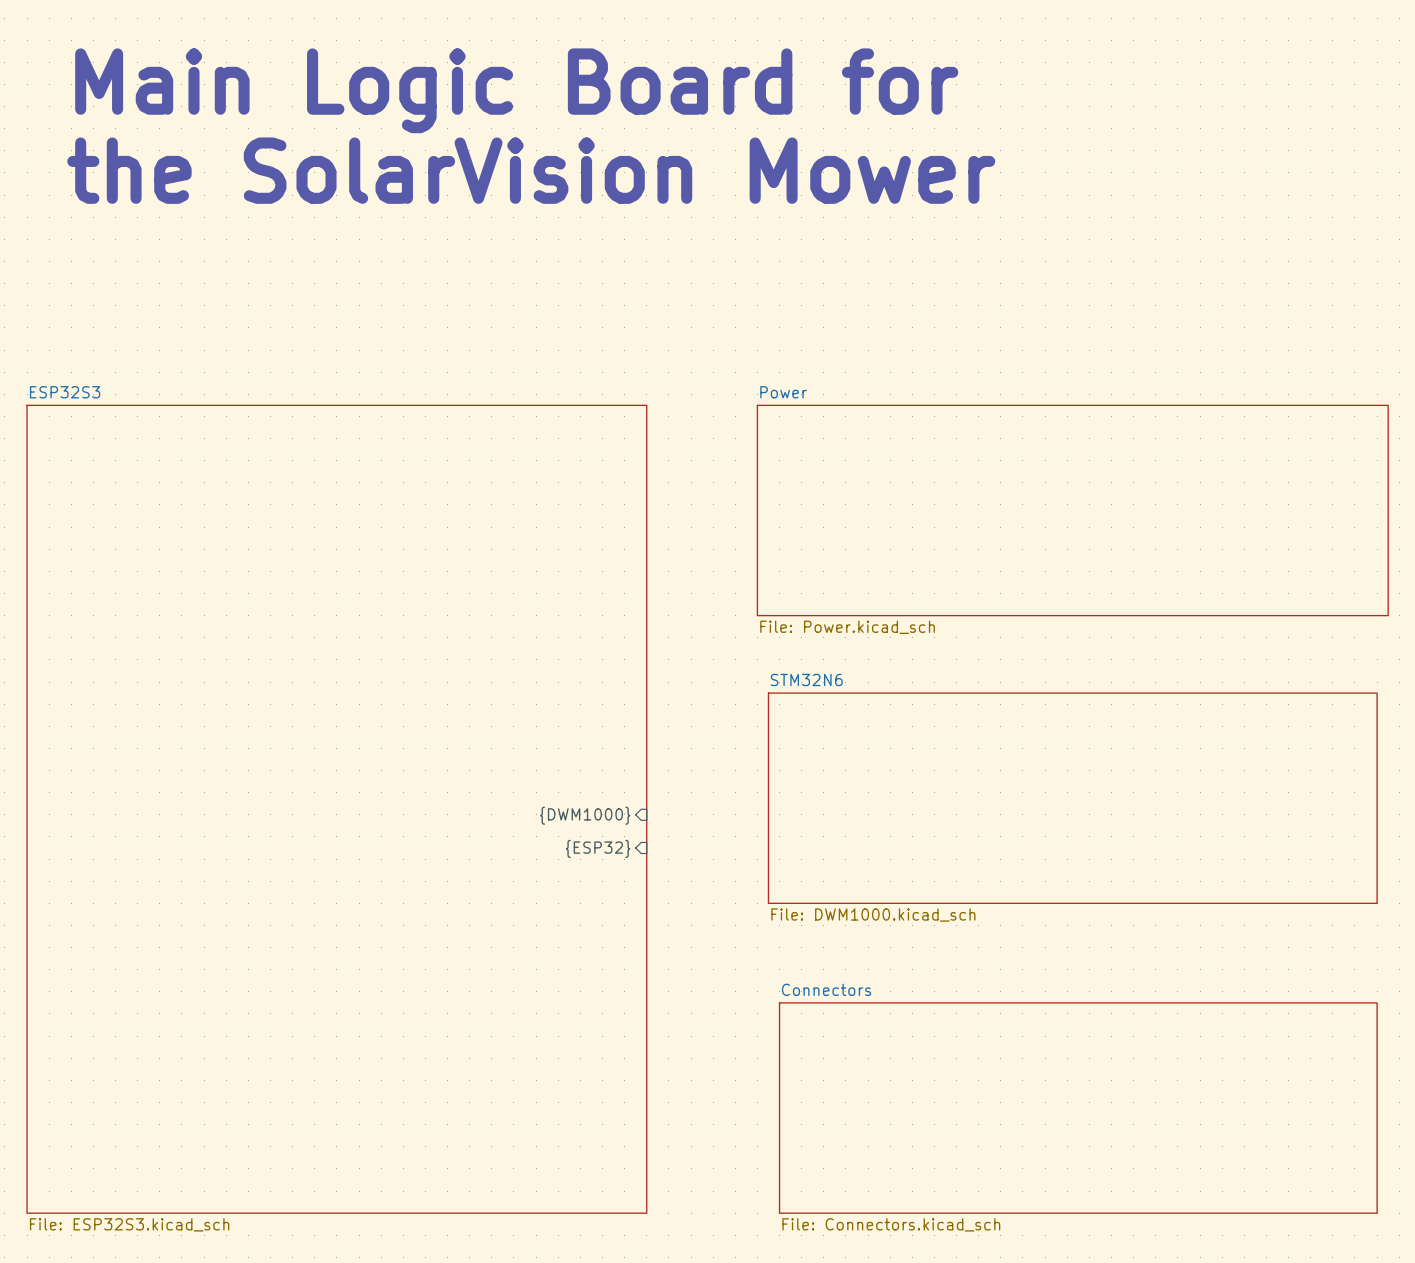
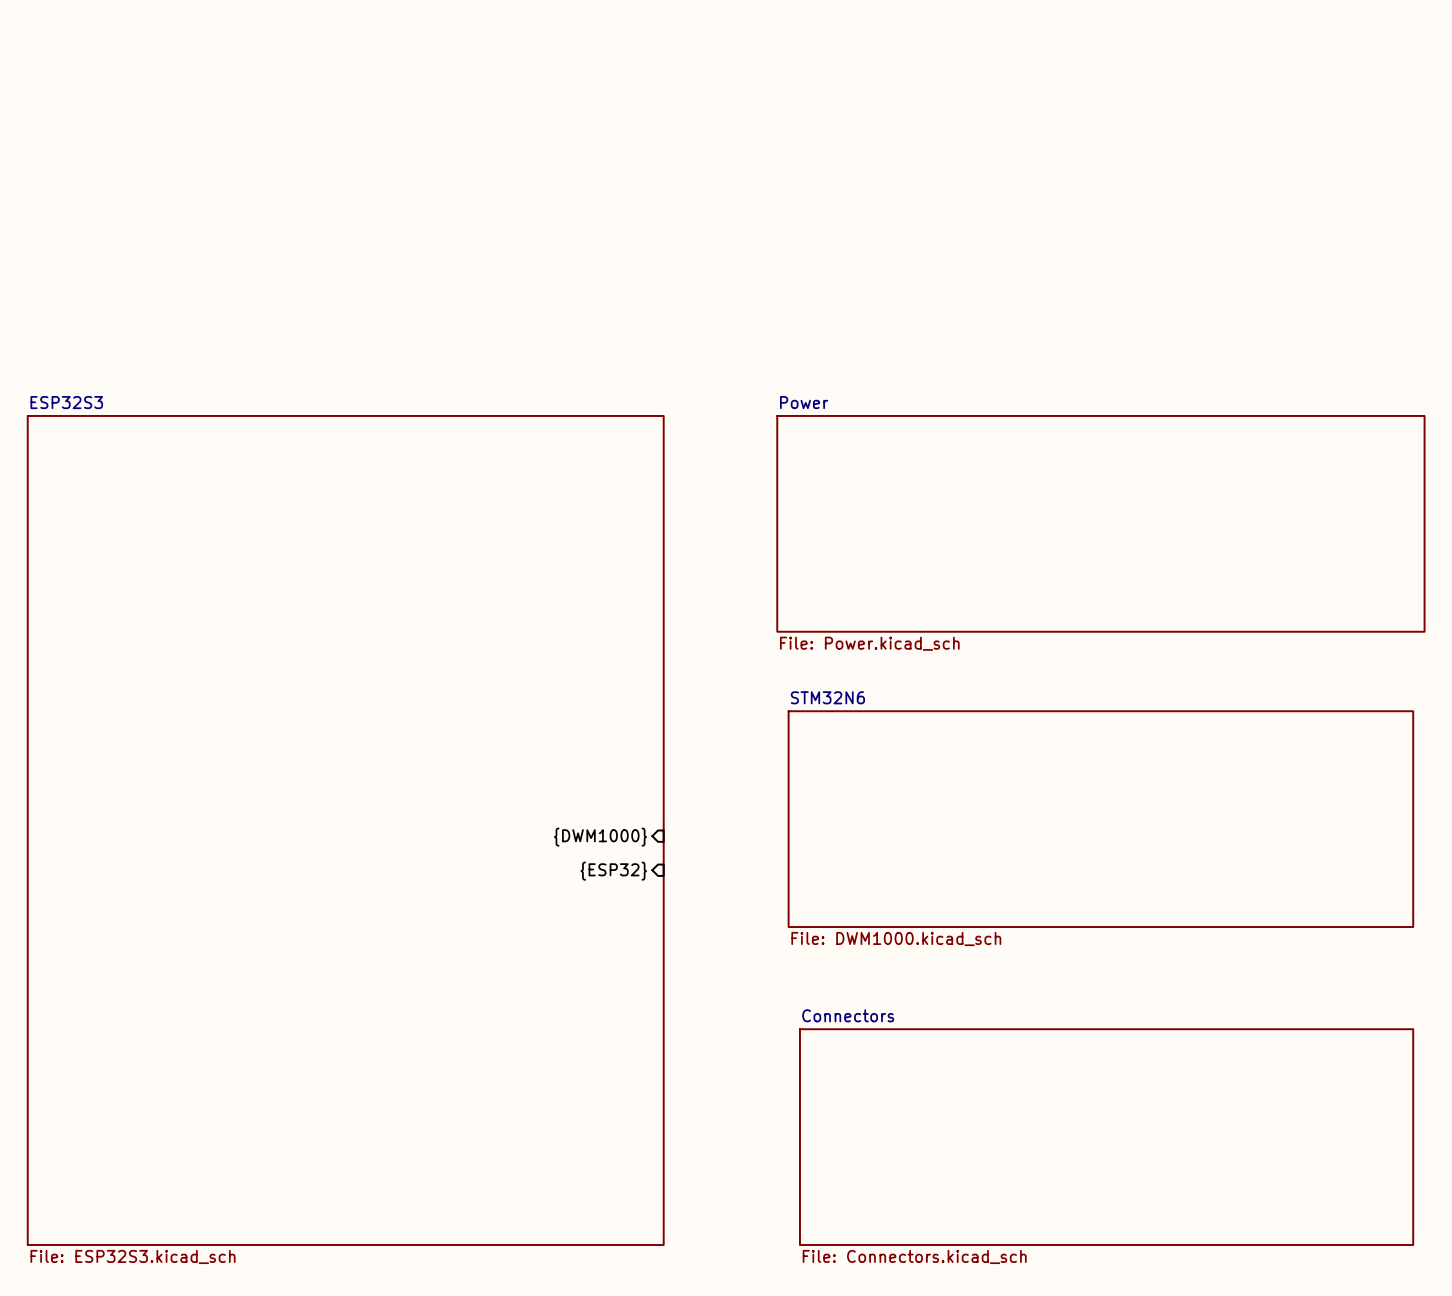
text: Main Logic Board for (516, 90) -> none
text: the SolarVision Mower (531, 170) -> none

